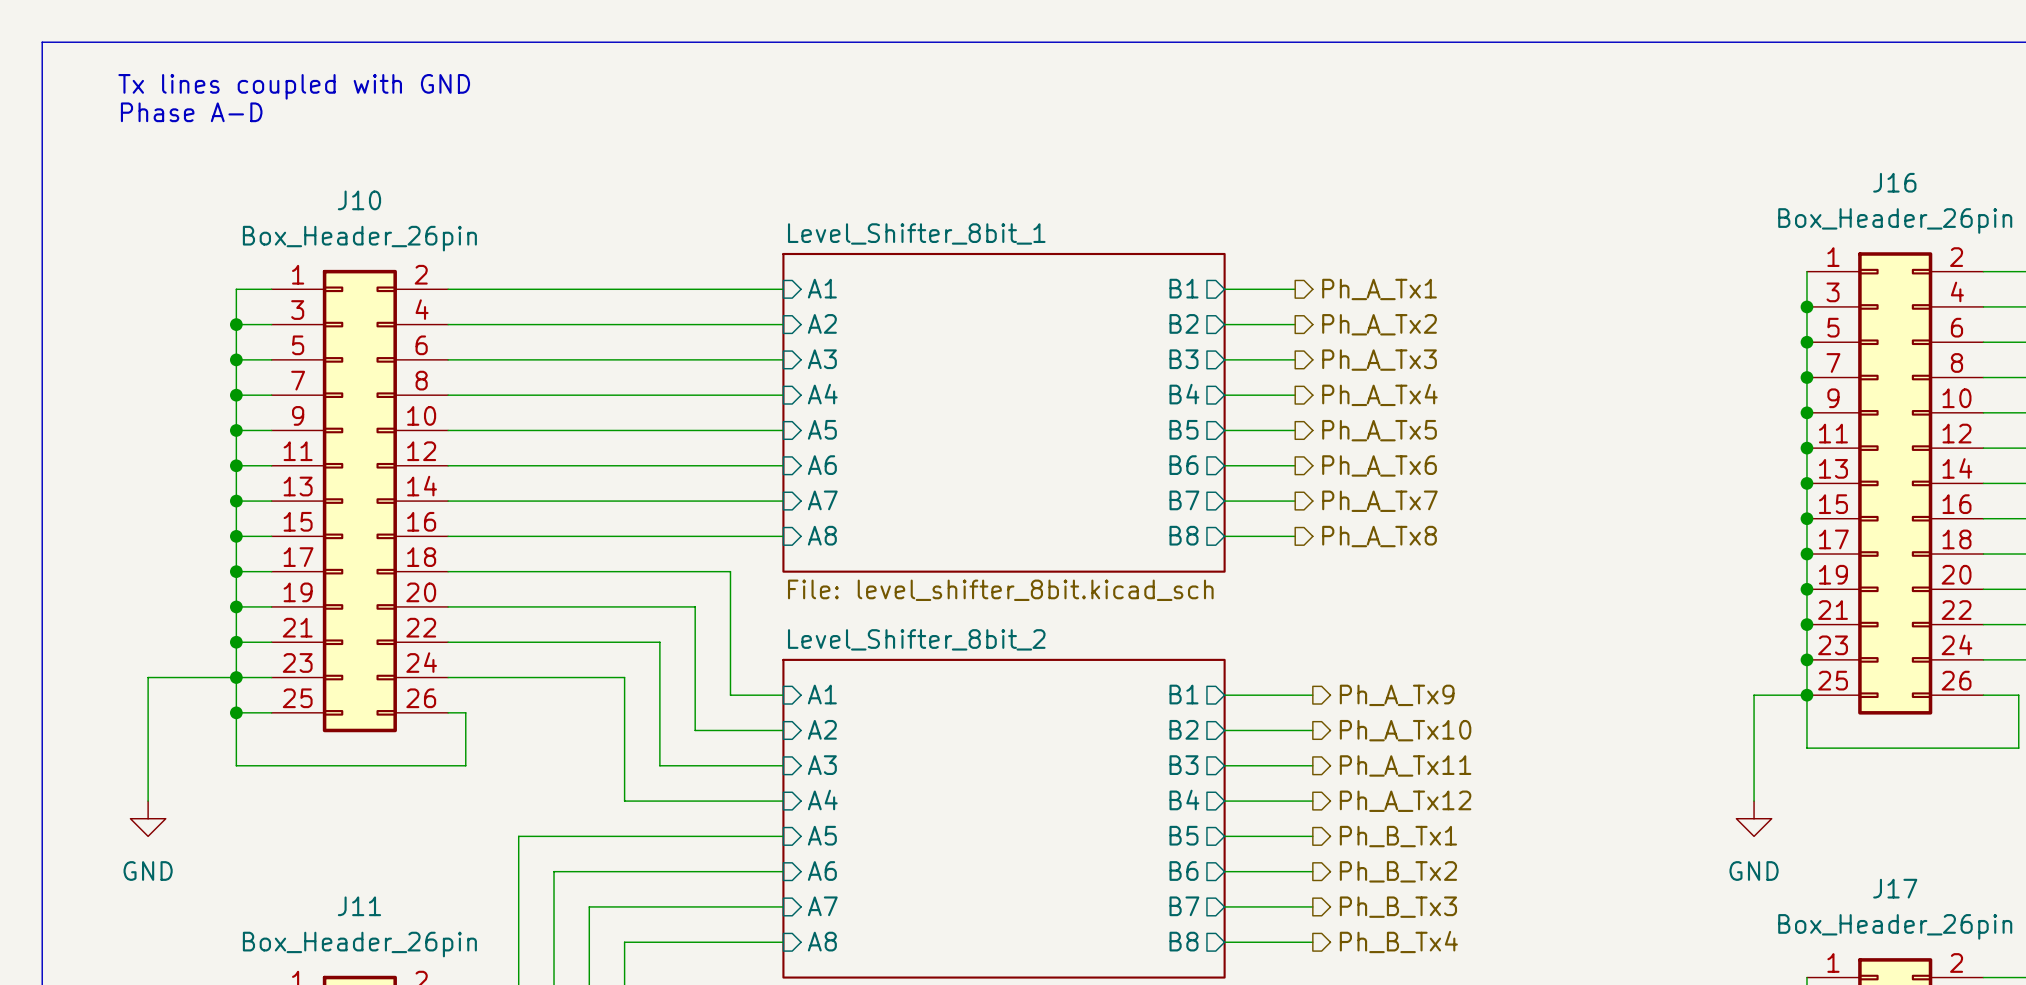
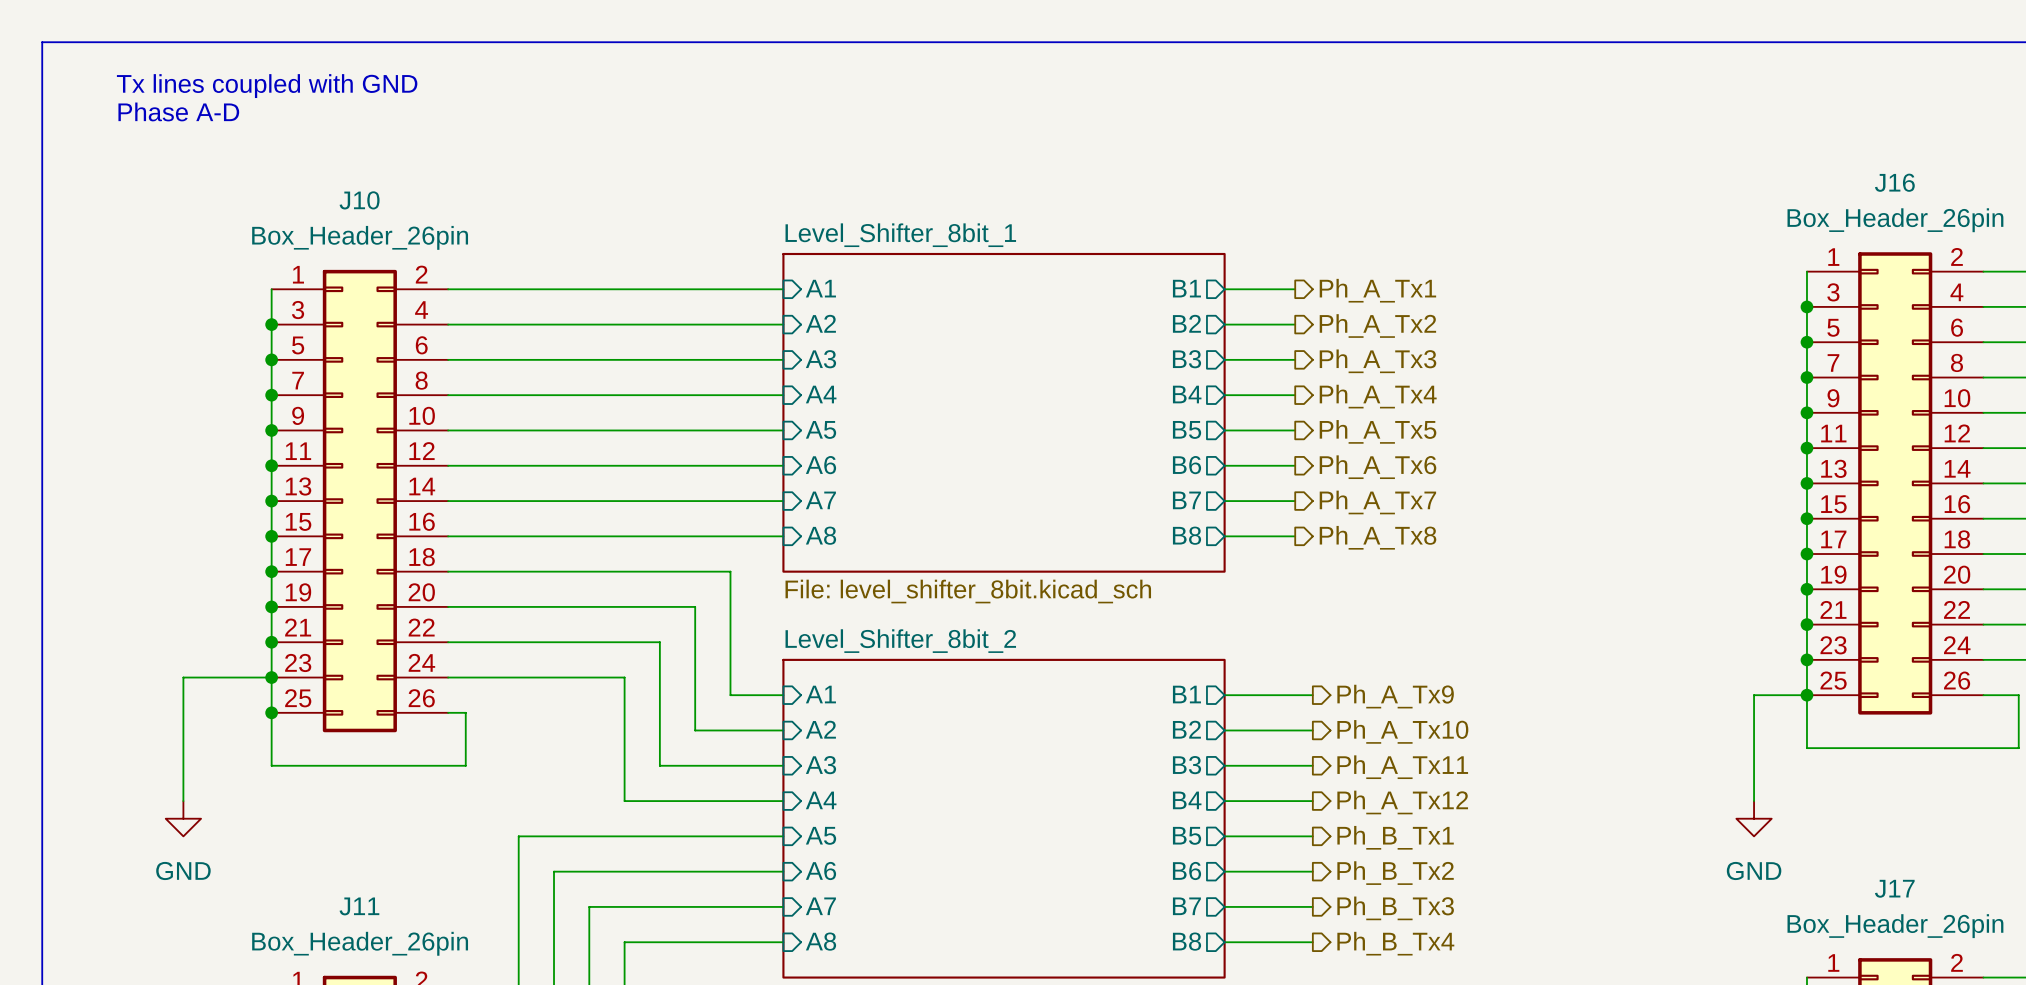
wire: (271, 289) (236, 289) (236, 765) (271, 765) -> (271, 289) (271, 765)
wire: (236, 324) (271, 324) -> none
junction: (236, 324) -> none
junction: none -> (271, 324)
wire: (236, 359) (271, 359) -> none
junction: (236, 359) -> none
junction: none -> (271, 359)
wire: (236, 395) (271, 395) -> none
junction: (236, 395) -> none
junction: none -> (271, 395)
wire: (236, 430) (271, 430) -> none
junction: (236, 430) -> none
junction: none -> (271, 430)
wire: (236, 465) (271, 465) -> none
junction: (236, 465) -> none
junction: none -> (271, 465)
wire: (236, 501) (271, 501) -> none
junction: (236, 501) -> none
junction: none -> (271, 501)
wire: (236, 536) (271, 536) -> none
junction: (236, 536) -> none
junction: none -> (271, 536)
wire: (236, 571) (271, 571) -> none
junction: (236, 571) -> none
junction: none -> (271, 571)
wire: (236, 606) (271, 606) -> none
junction: (236, 606) -> none
junction: none -> (271, 606)
wire: (236, 642) (271, 642) -> none
junction: (236, 642) -> none
junction: none -> (271, 642)
wire: (183, 677) (148, 677) (148, 801) -> (183, 677) (183, 801)
junction: (236, 677) -> none
junction: none -> (271, 677)
wire: (236, 712) (271, 712) -> none
junction: (236, 712) -> none
junction: none -> (271, 712)
power symbol position: GND (148, 818) -> GND (183, 818)

